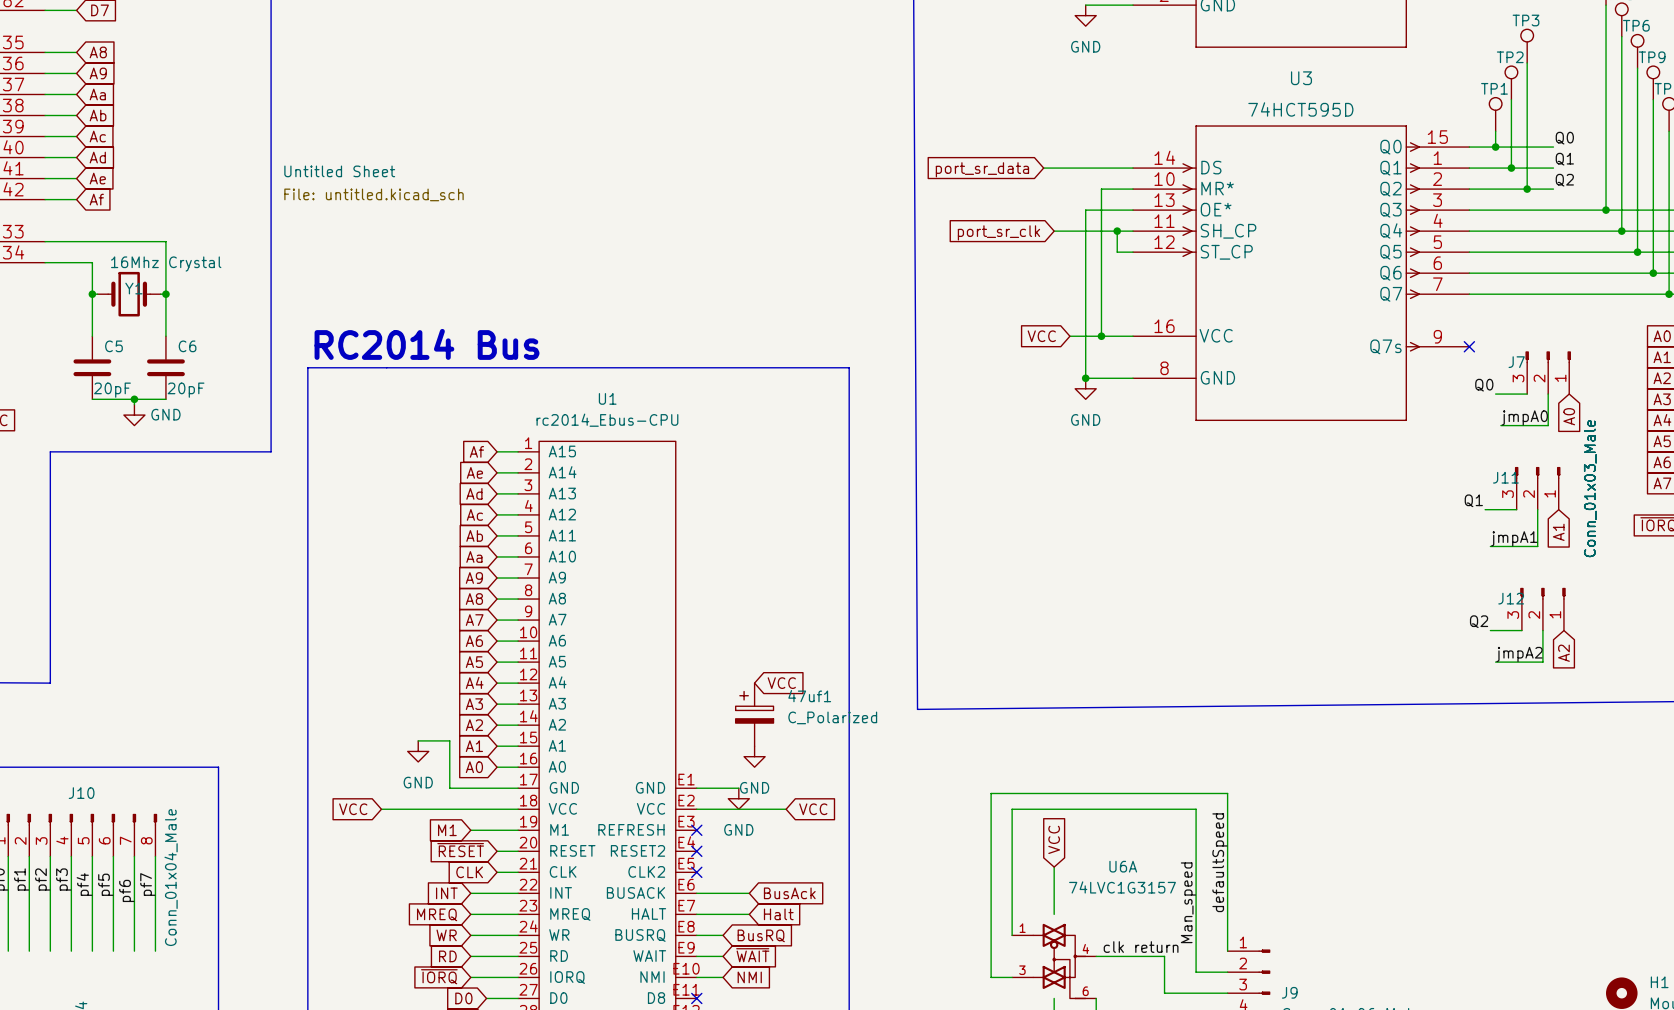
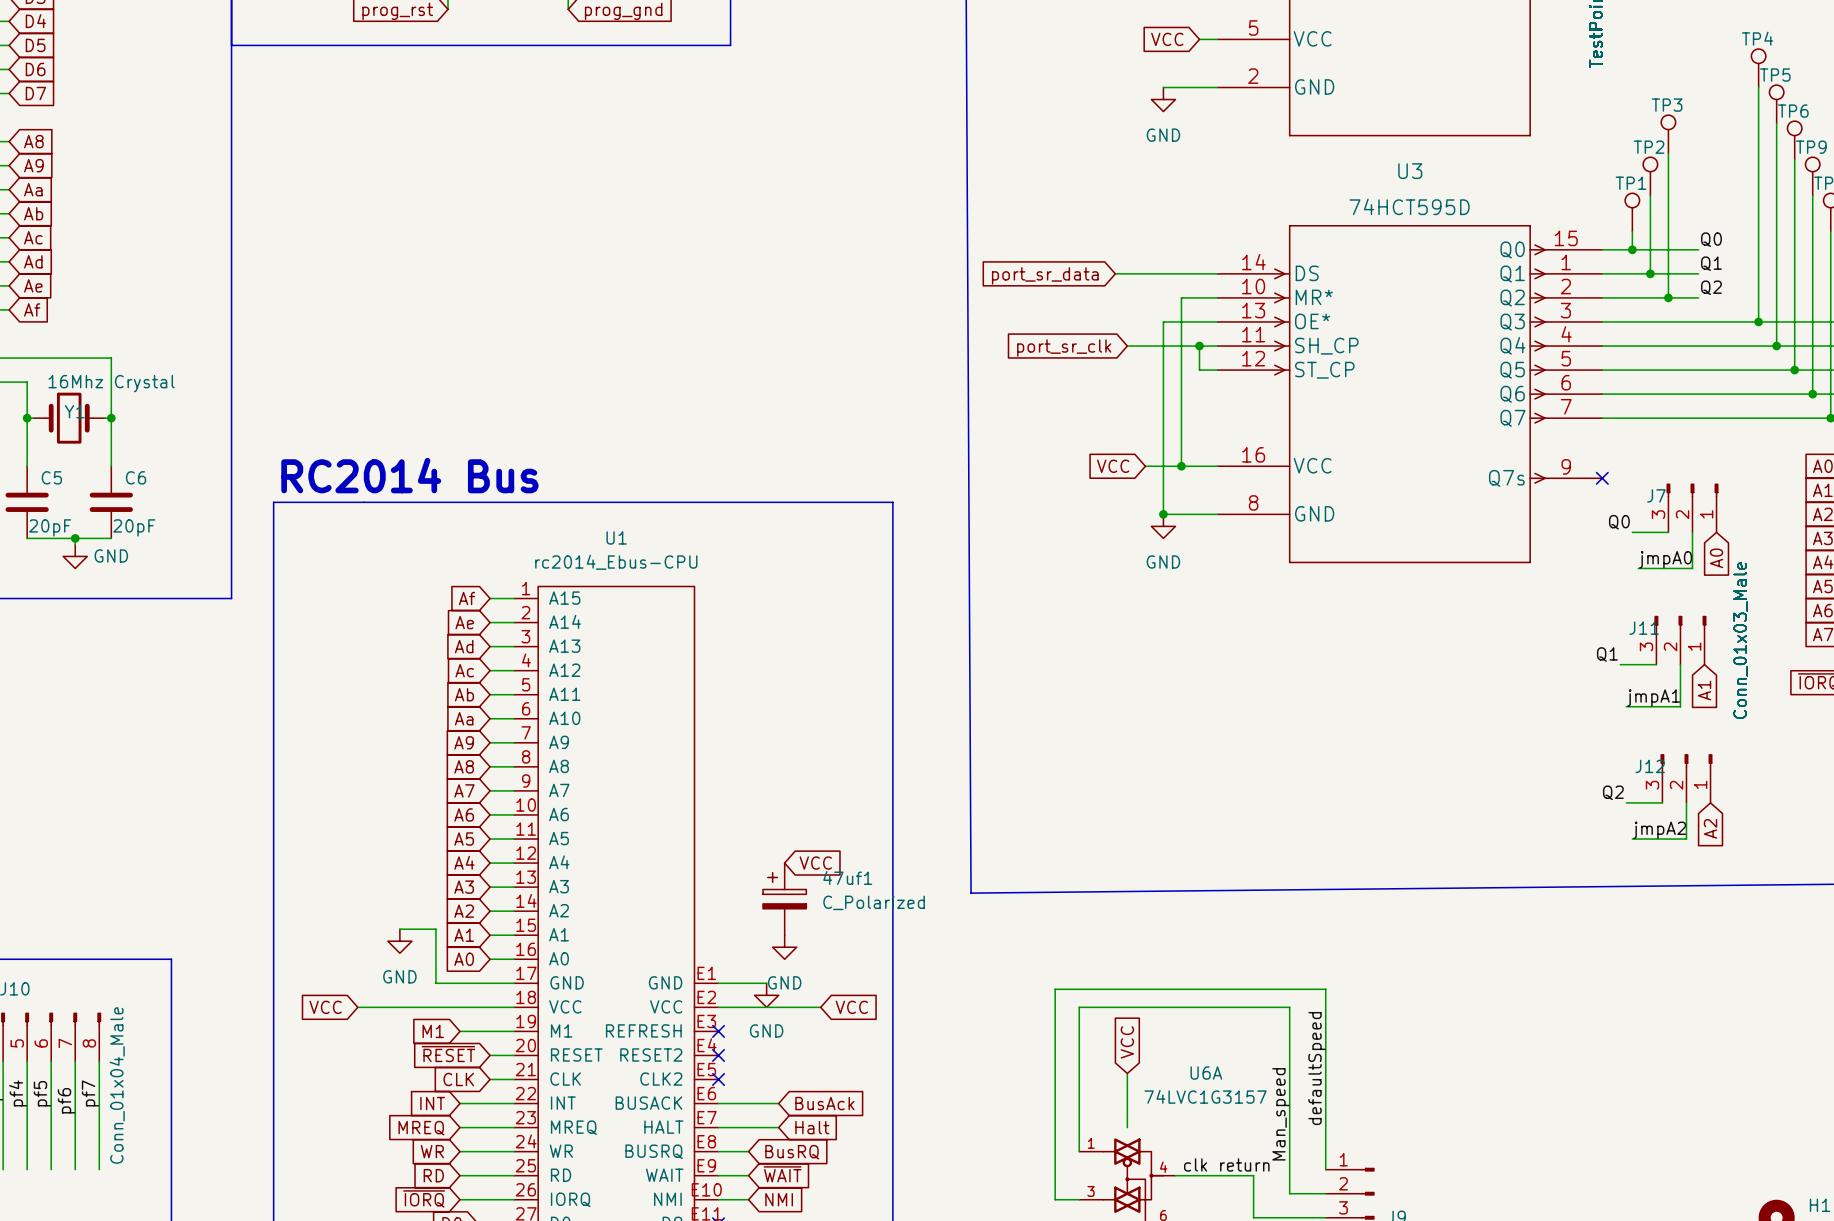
sheet Untitled Sheet: File: untitled.kicad_sch (281, 183) -> none

